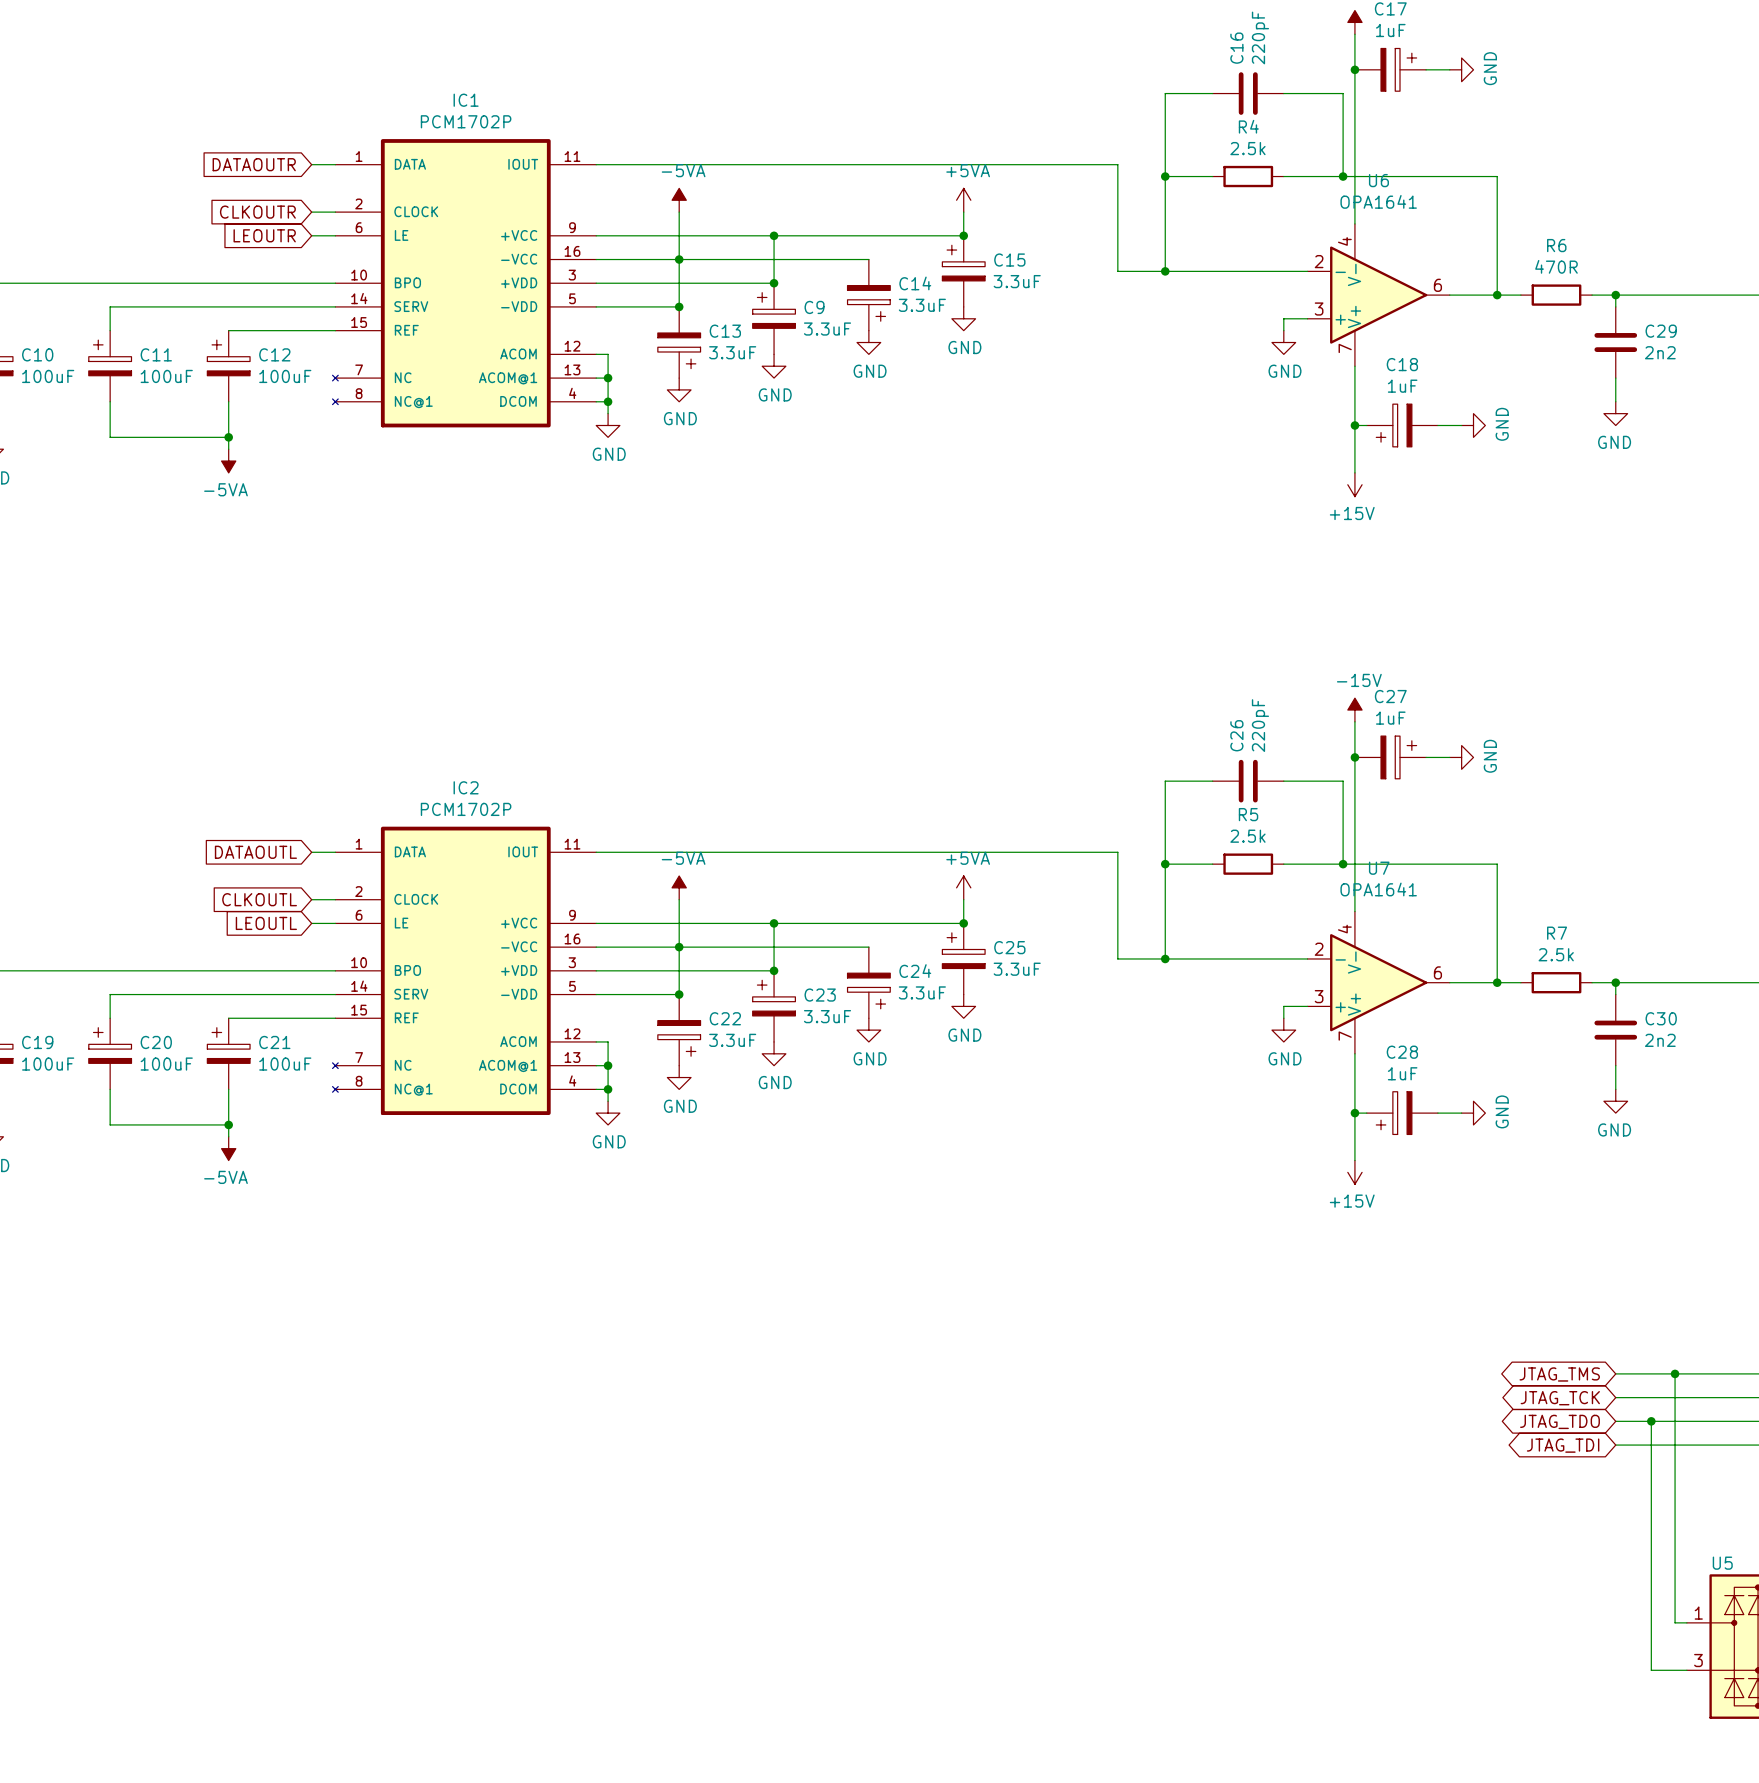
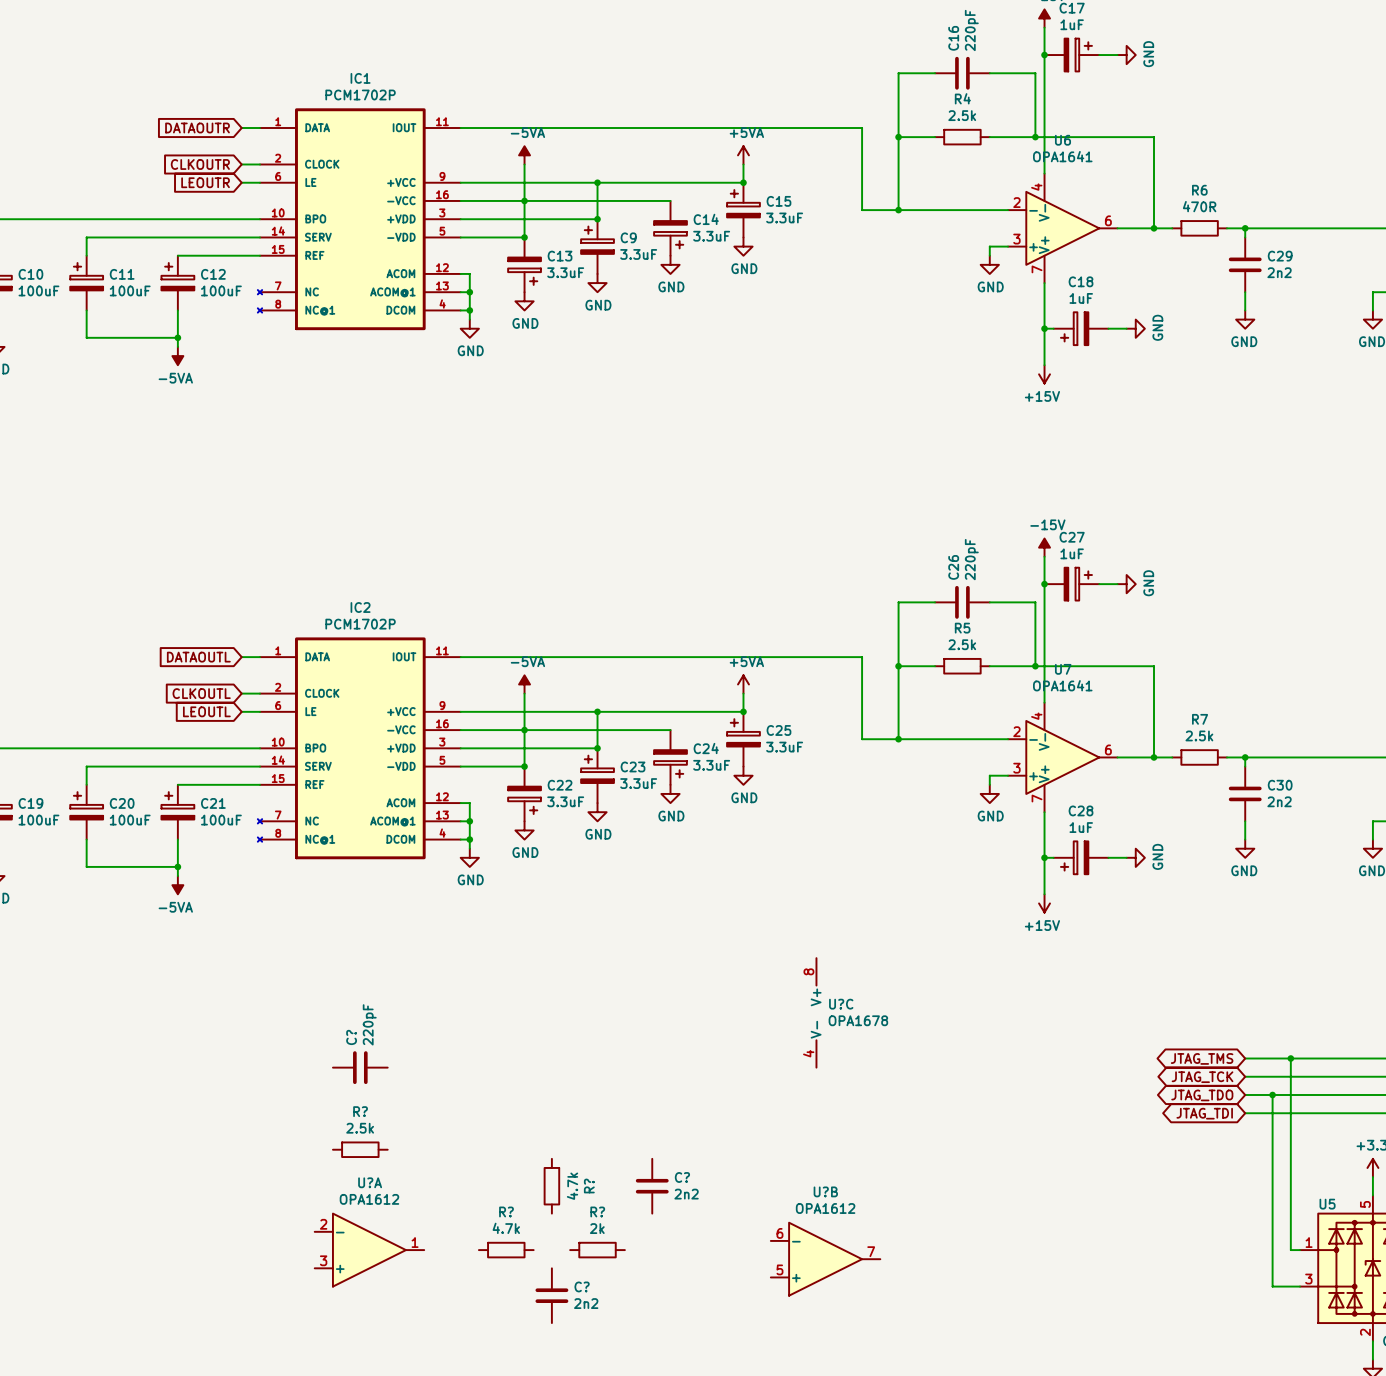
U?C: none -> OPA1678 (816, 1012)
C?: none -> 220pF (360, 1067)
R?: none -> 2.5k (360, 1149)
R?: none -> 4.7k (551, 1186)
C?: none -> 2n2 (652, 1186)
U?A: none -> OPA1612 (369, 1250)
R?: none -> 4.7k (506, 1250)
R?: none -> 2k (597, 1250)
U?B: none -> OPA1612 (825, 1259)
C?: none -> 2n2 (551, 1295)

